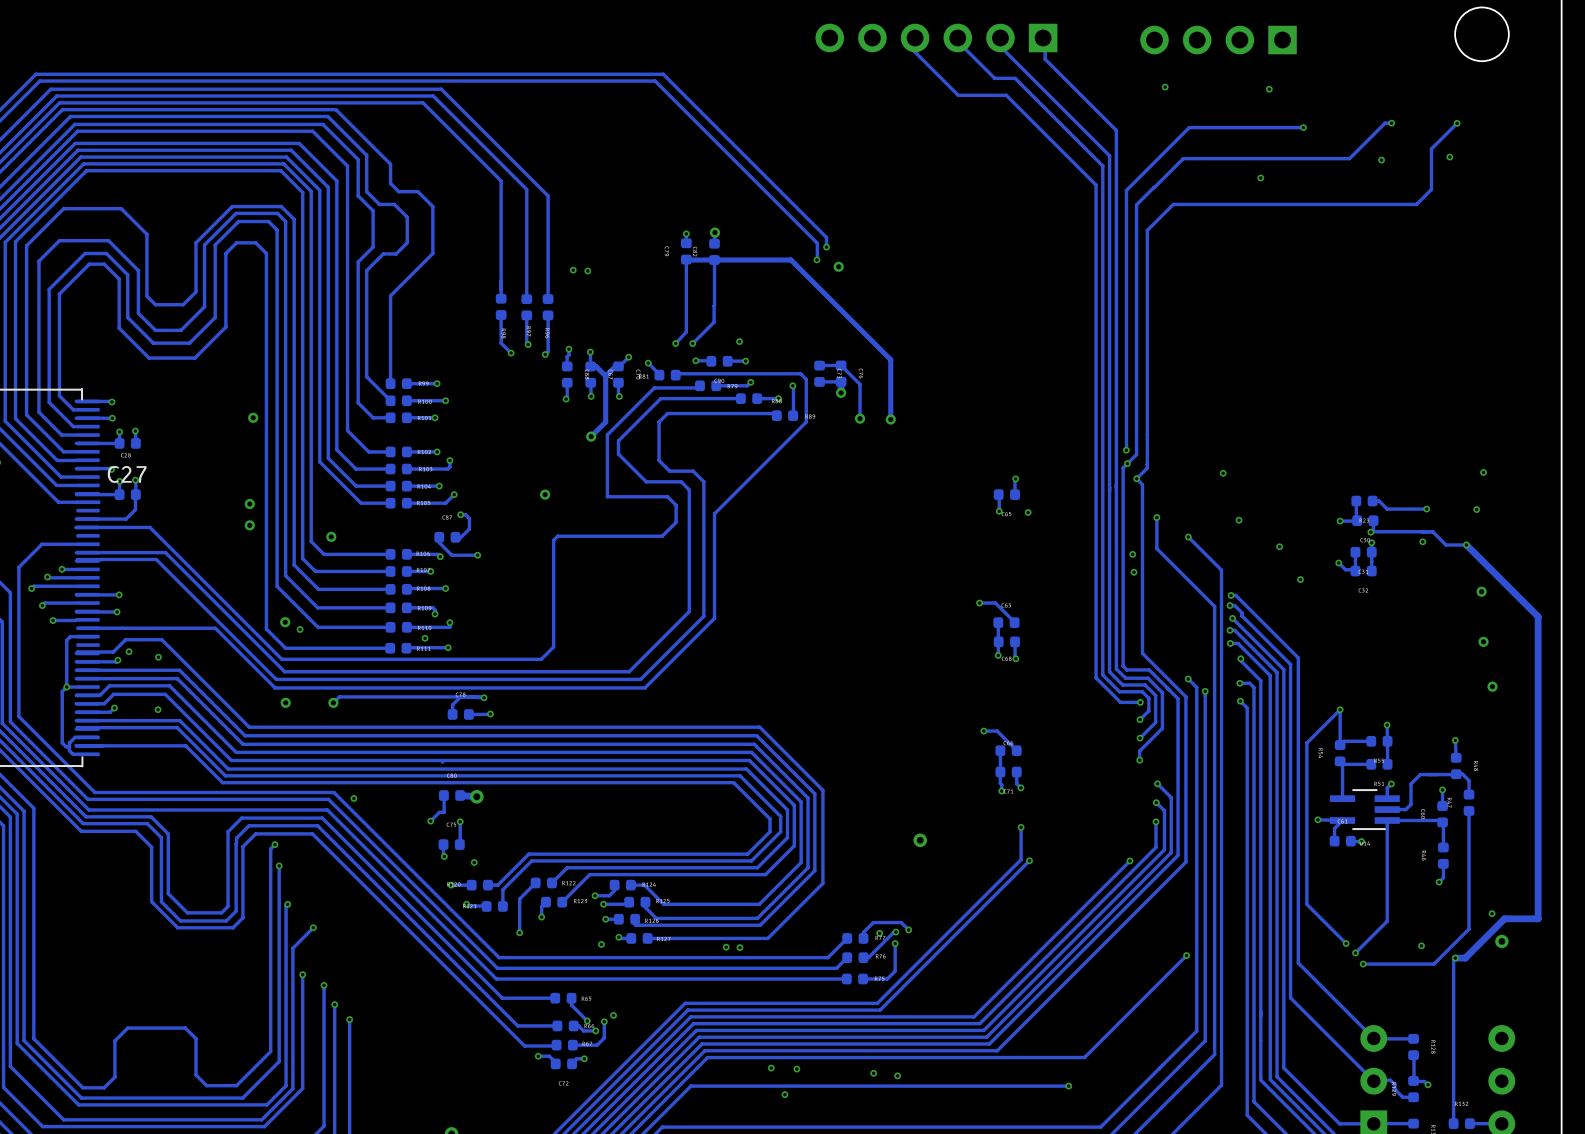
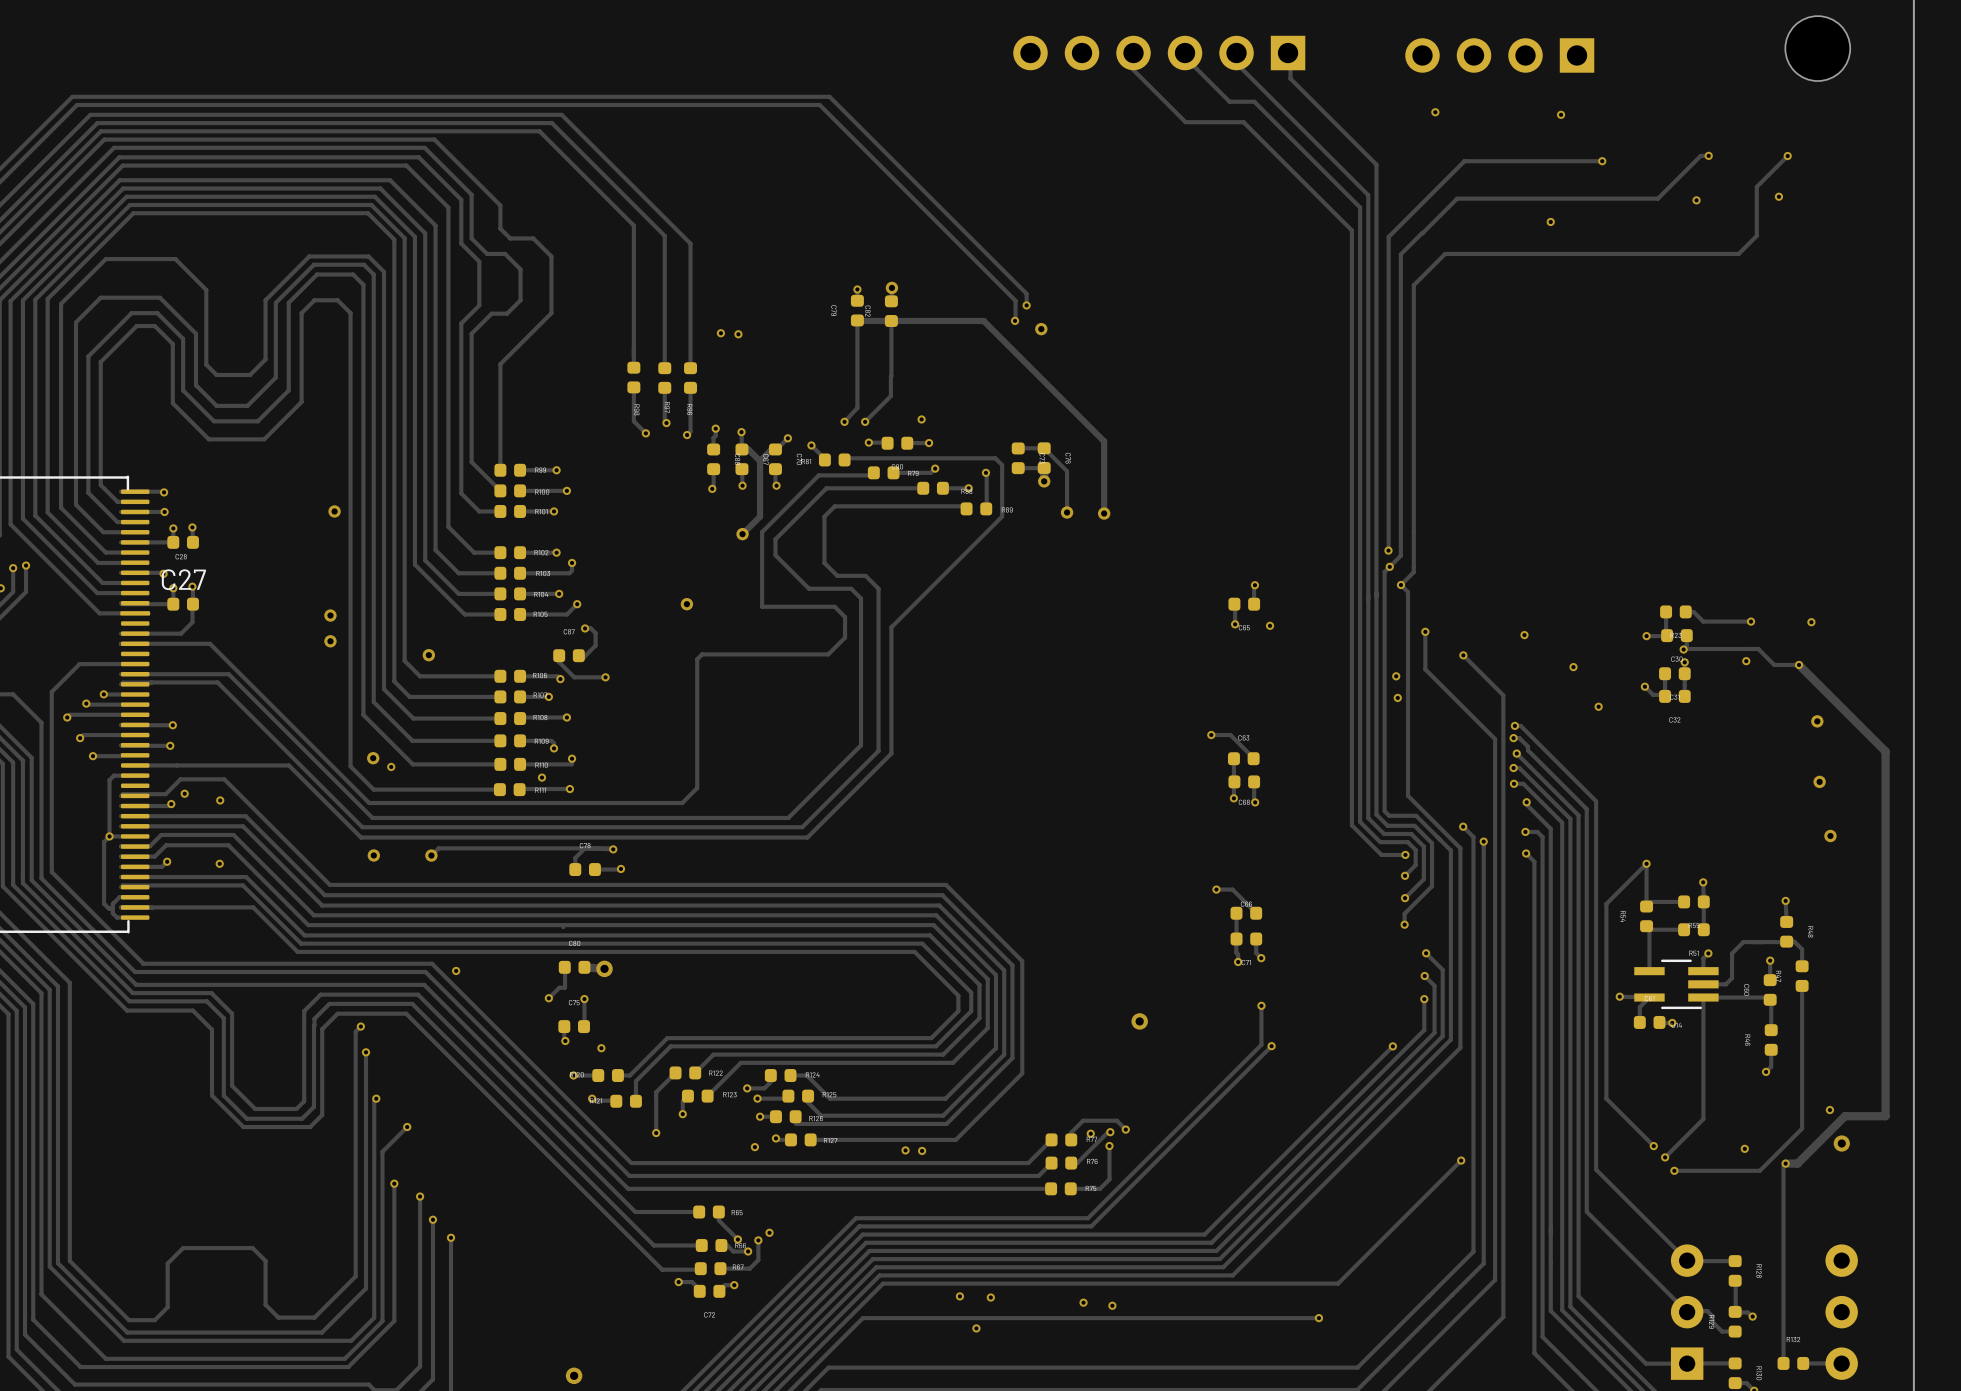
via: (1483, 472) -> none
via: (1223, 473) -> none

